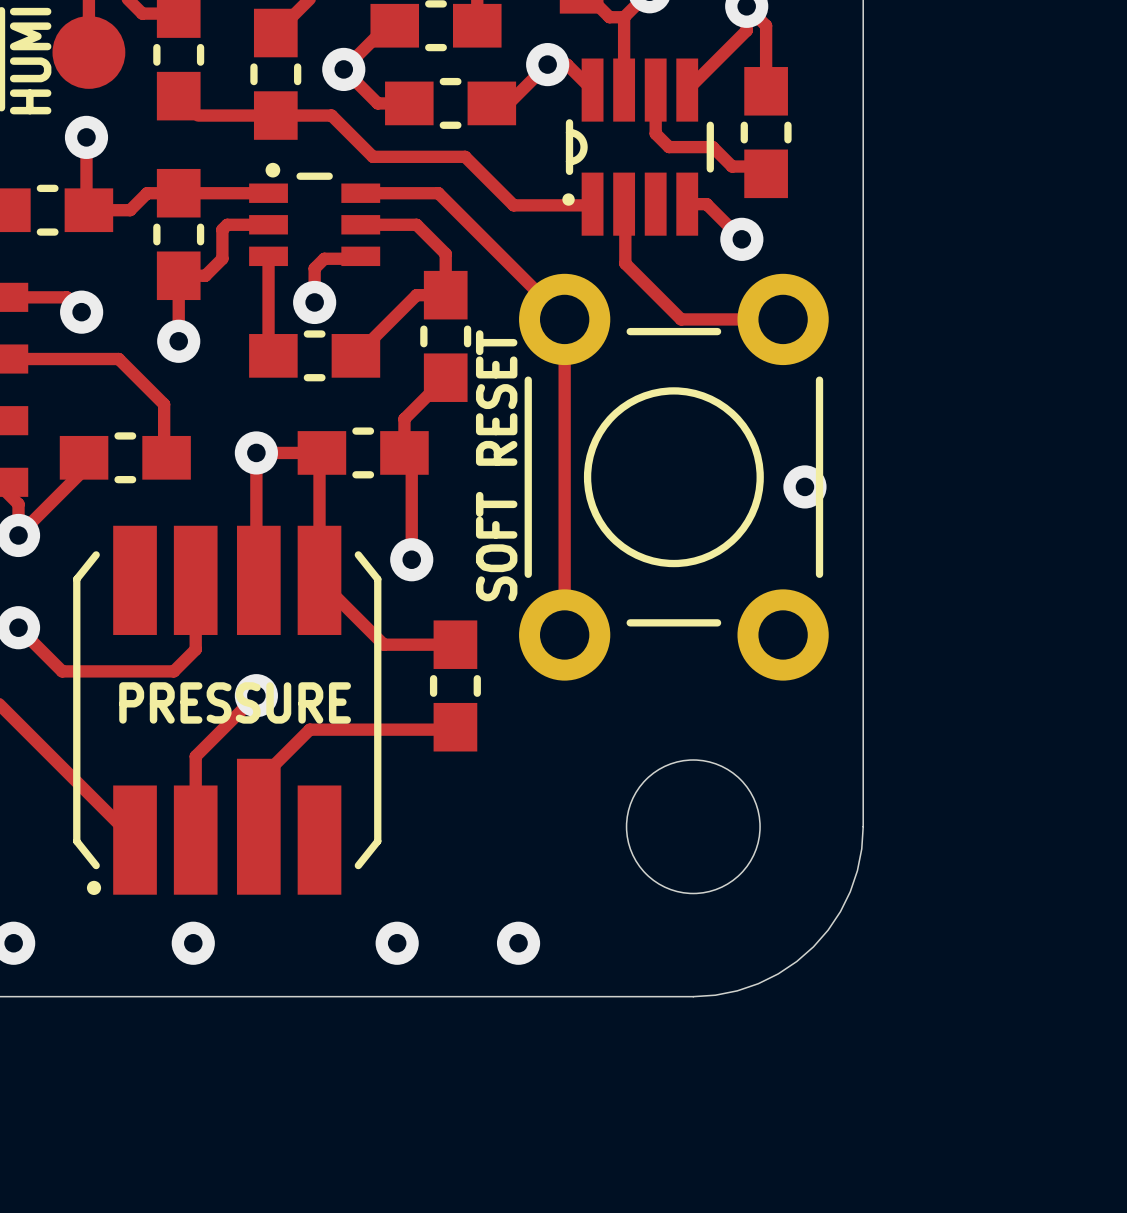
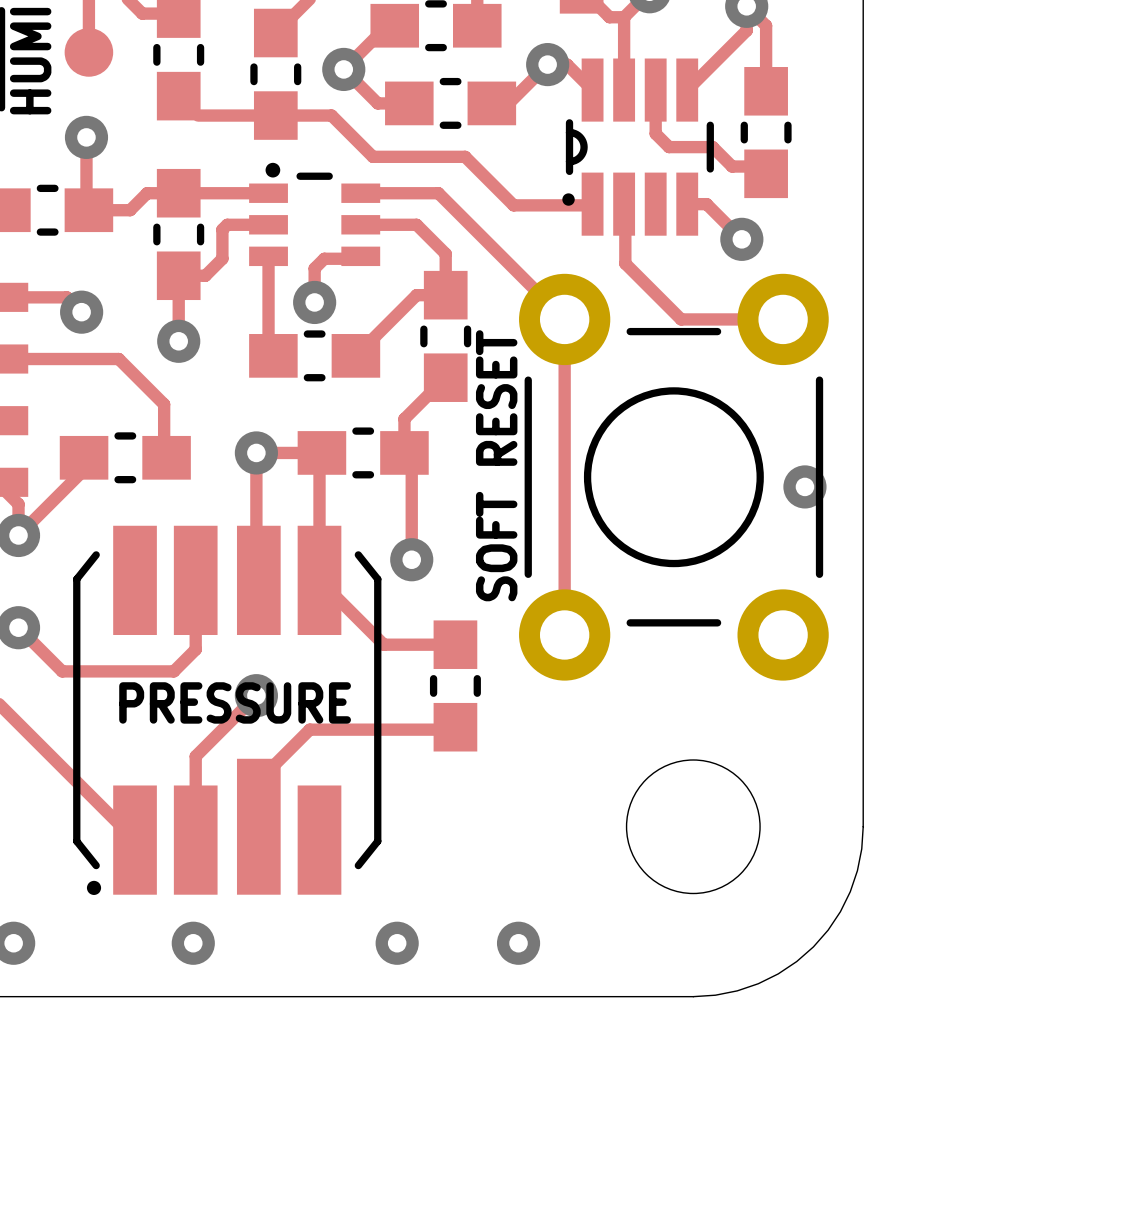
part footprint: [52, 16, 126, 89] -> [64, 28, 114, 77]

